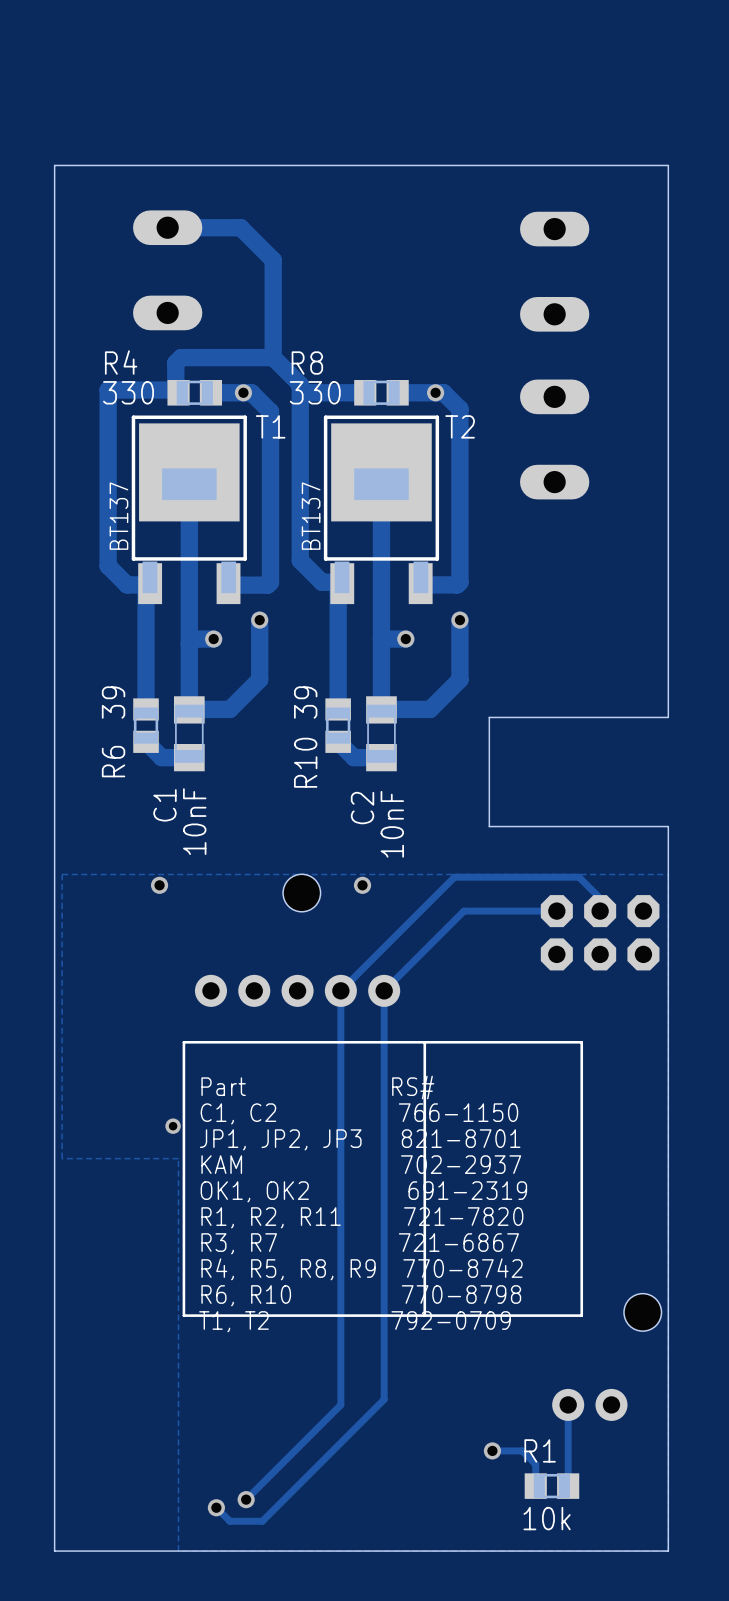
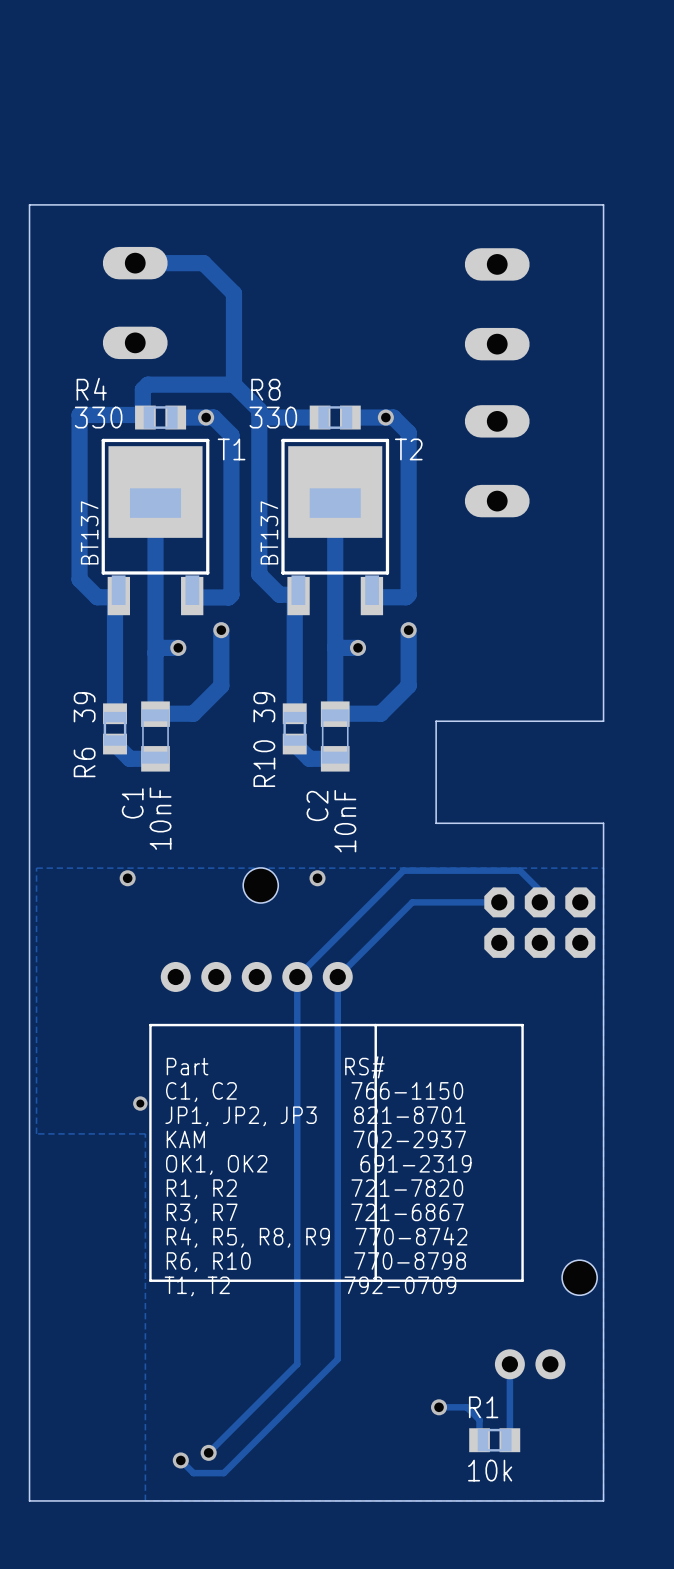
text: R1, R2, R11 721-7820 (362, 1217) -> R1, R2 721-7820 (314, 1189)

